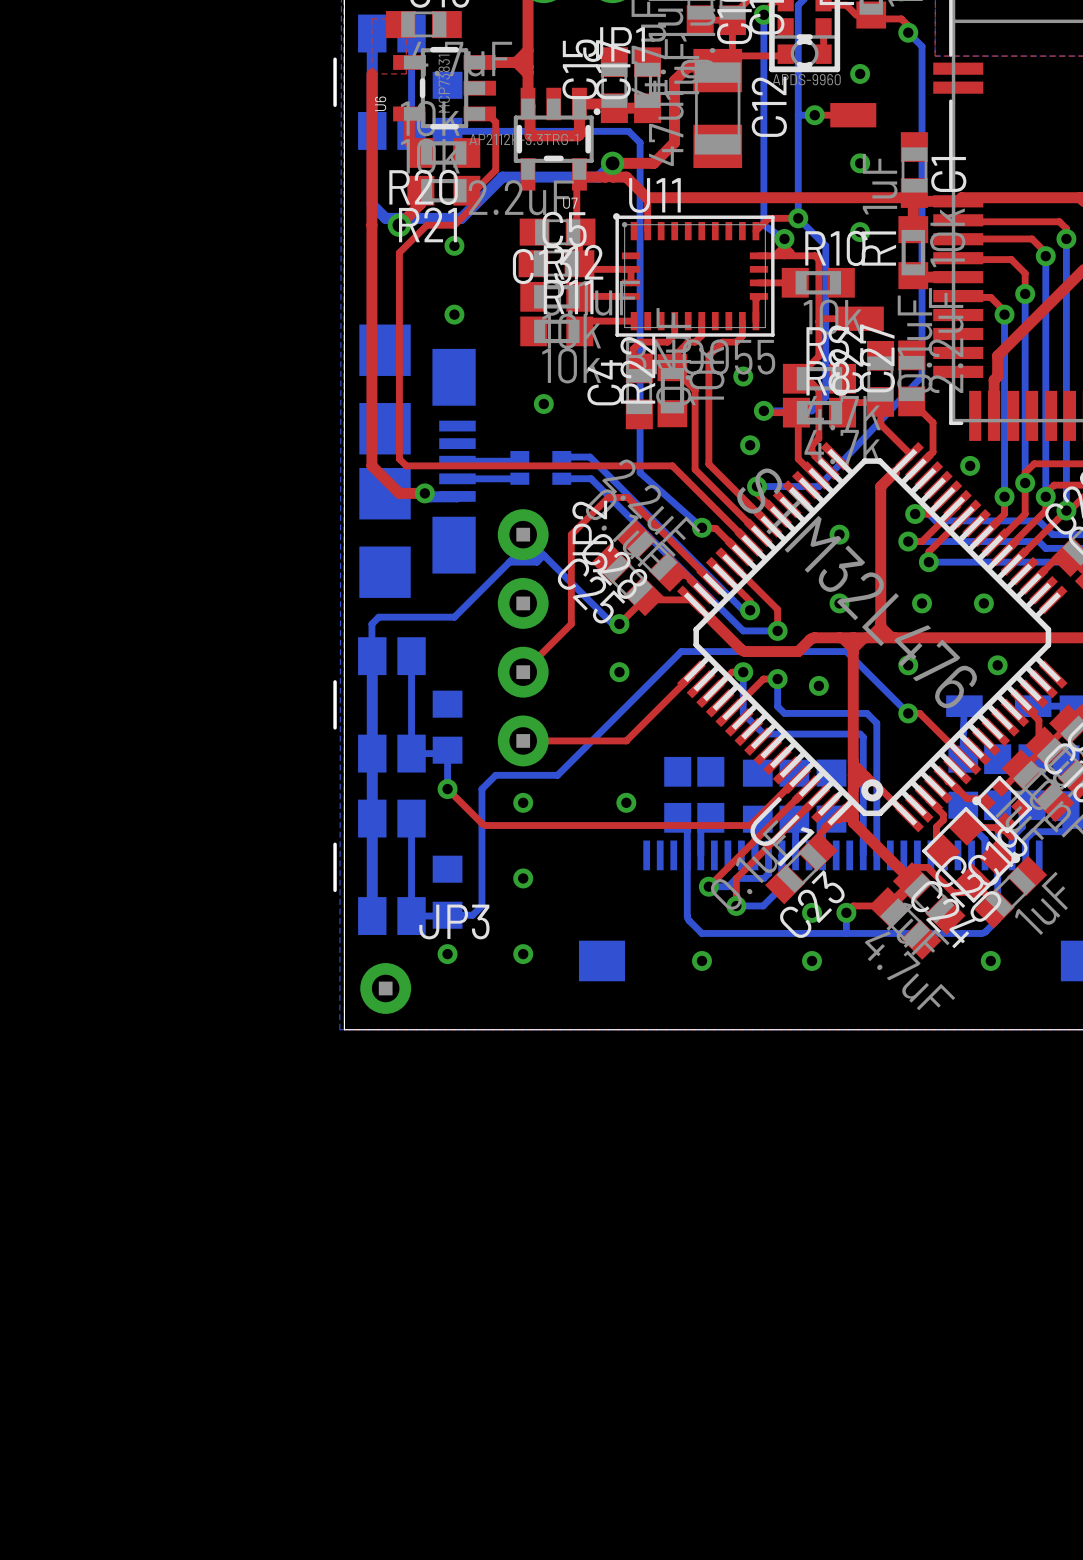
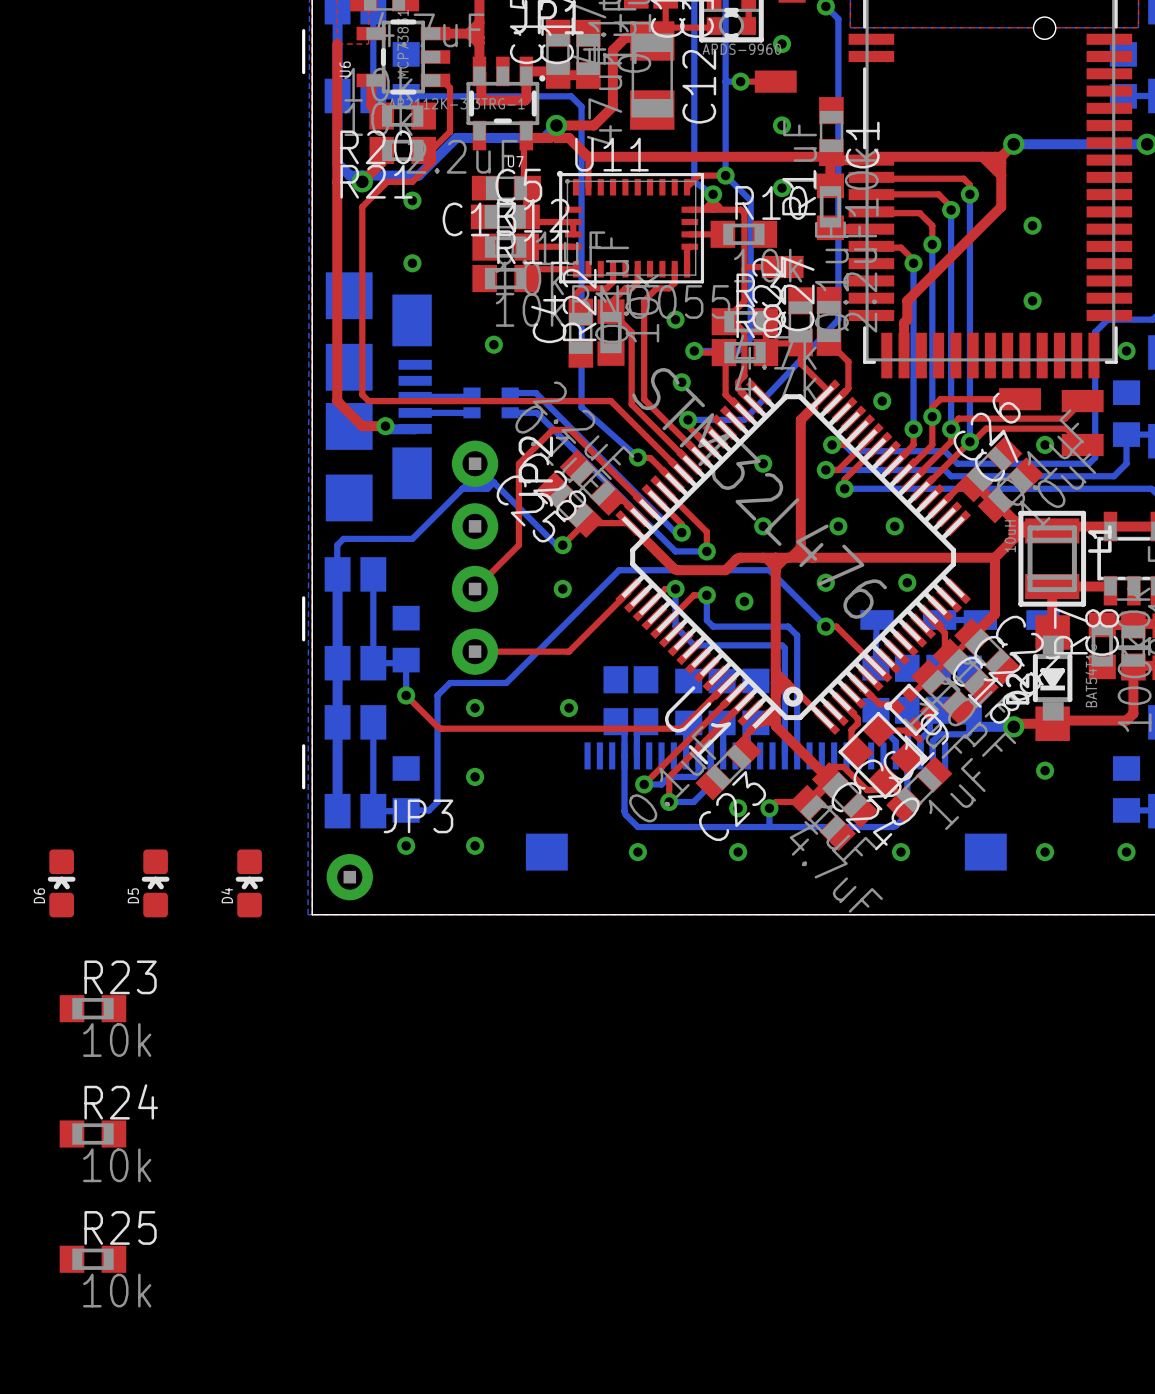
D6: none -> (61, 883)
D5: none -> (155, 883)
D4: none -> (249, 883)
R23: none -> 10k (92, 1008)
R24: none -> 10k (92, 1133)
R25: none -> 10k (92, 1259)

